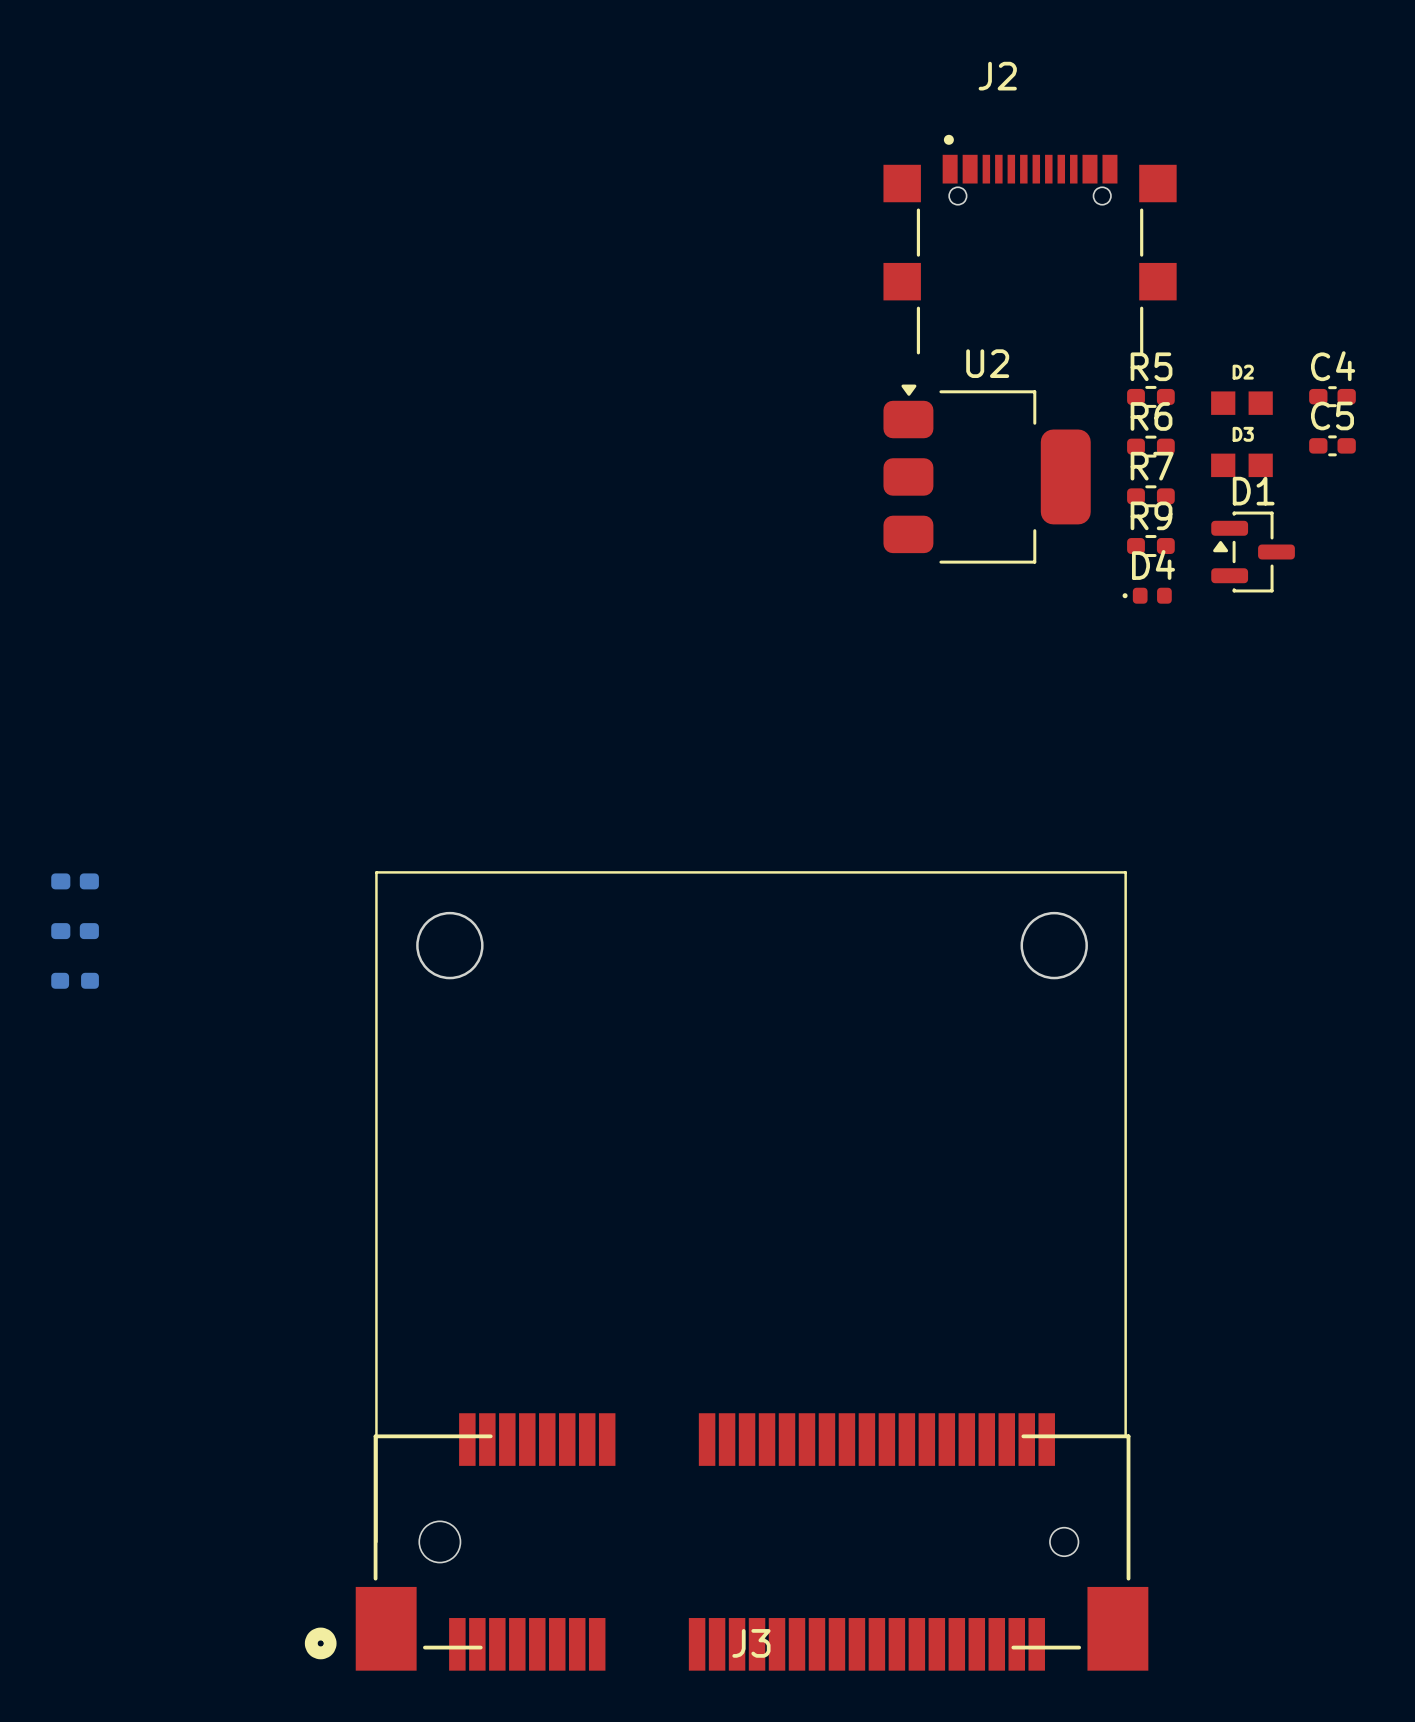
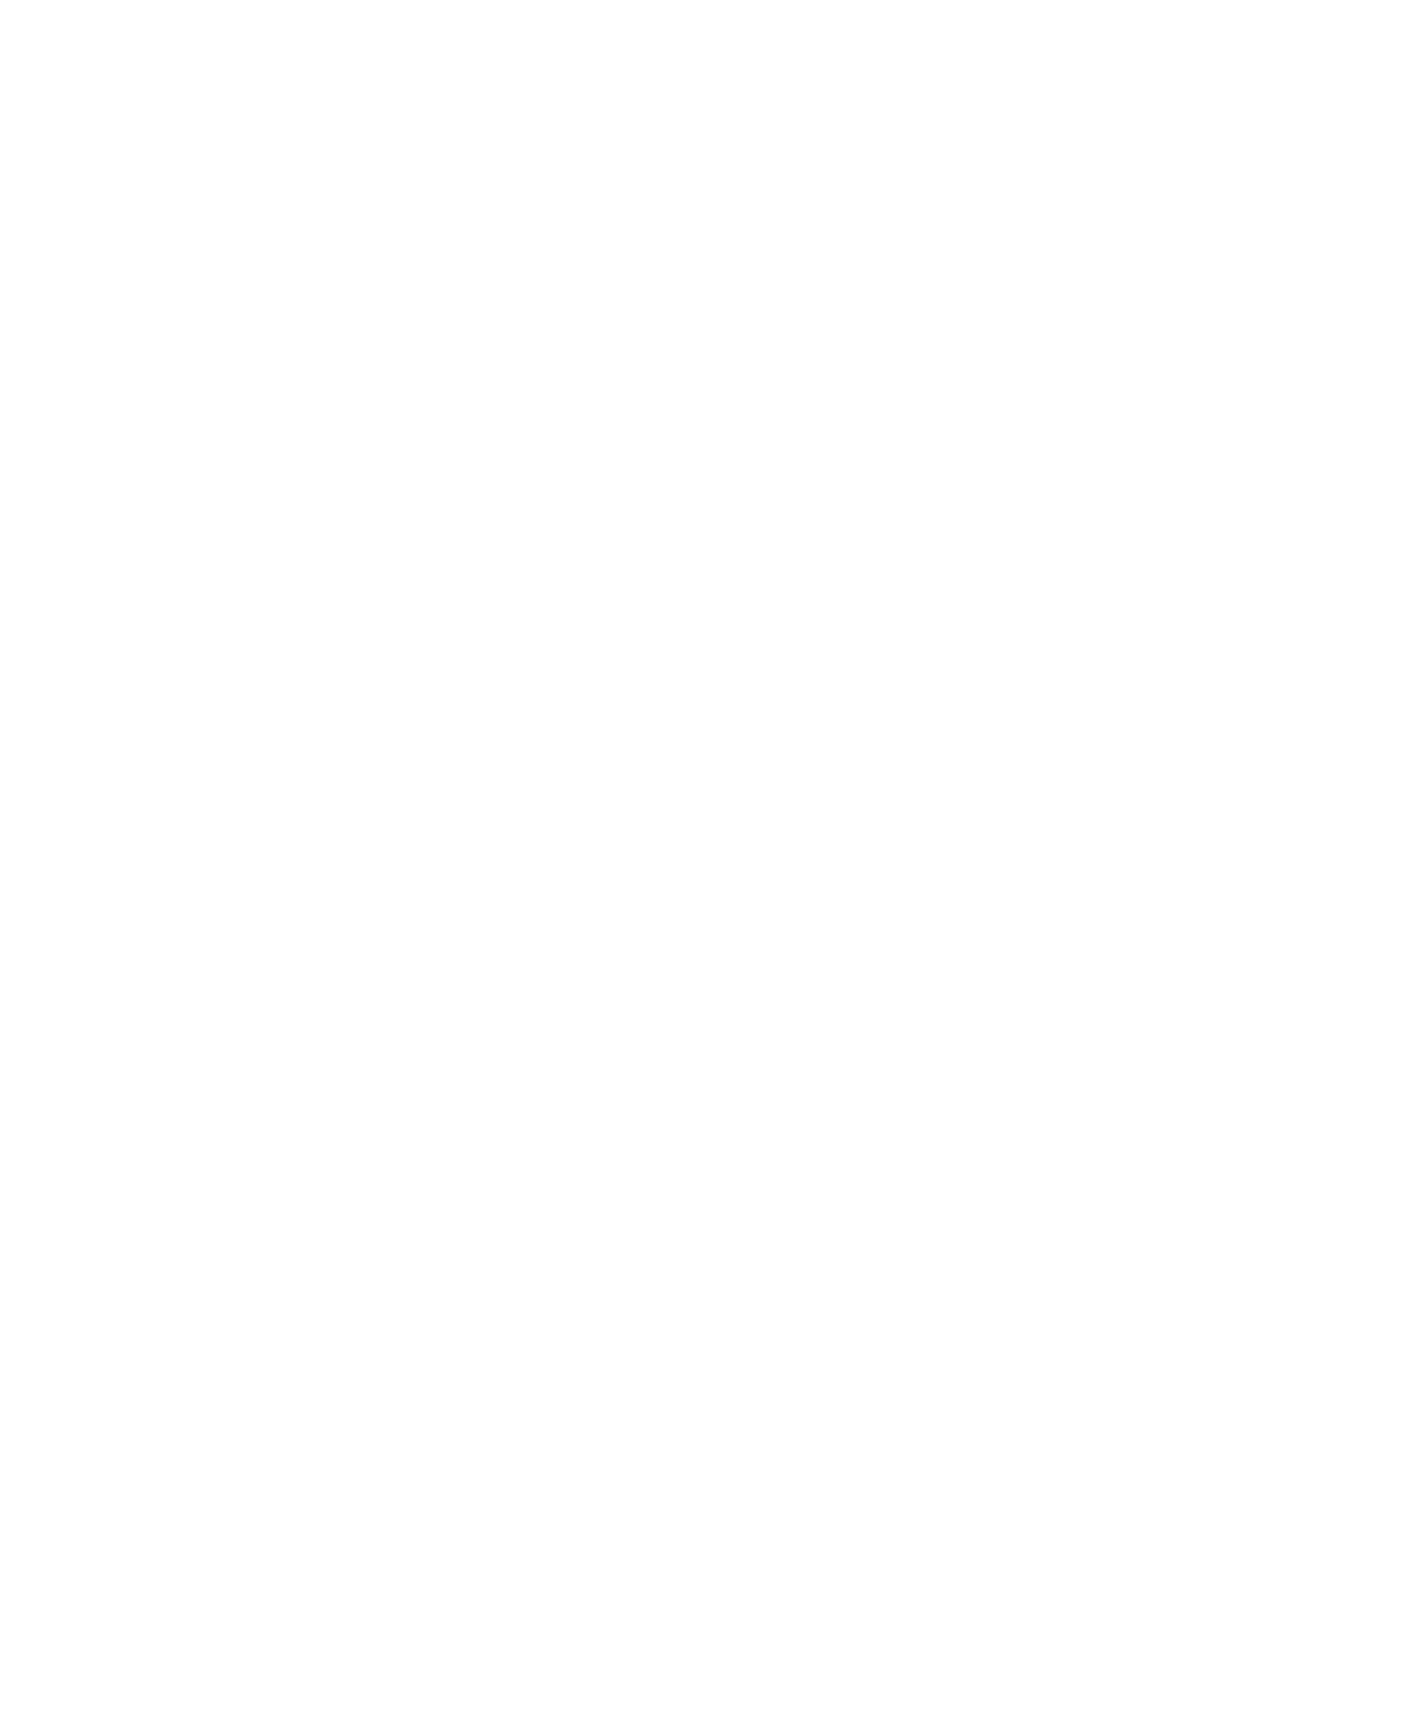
J2: (1030, 244) -> none
R5: (1150, 396) -> none
C4: (1332, 396) -> none
D2: (1241, 403) -> none
C5: (1332, 445) -> none
R6: (1150, 446) -> none
D3: (1241, 465) -> none
U2: (987, 474) -> none
R7: (1150, 496) -> none
R9: (1150, 546) -> none
D1: (1253, 552) -> none
D4: (1147, 595) -> none
part: (75, 881) -> none
part: (75, 931) -> none
part: (75, 980) -> none
J3: (726, 1270) -> none

